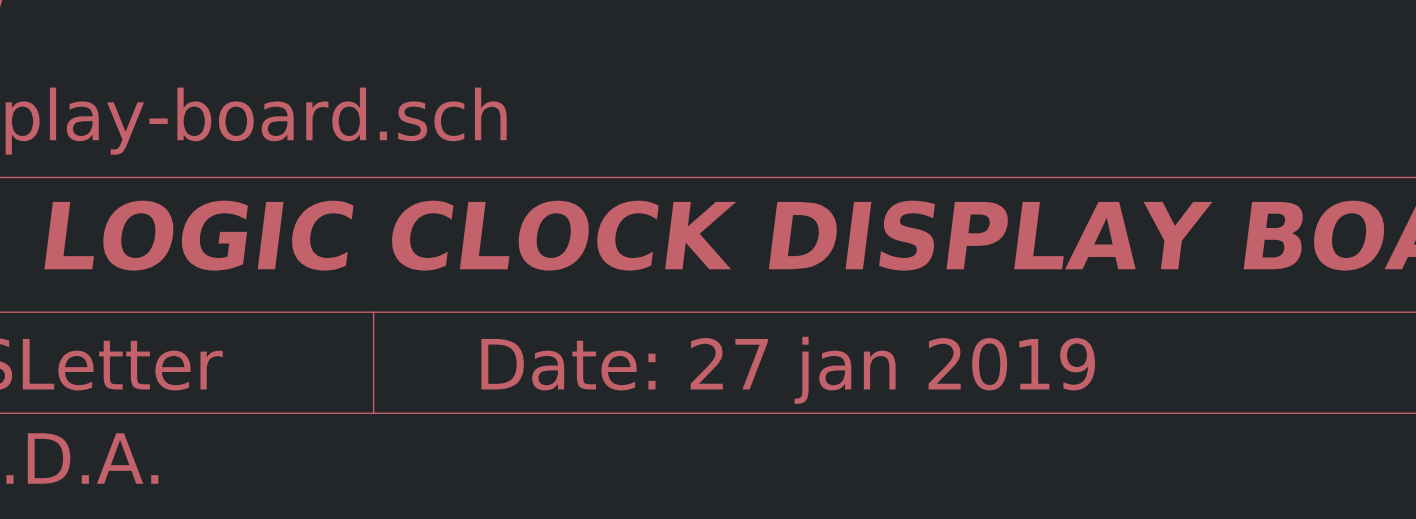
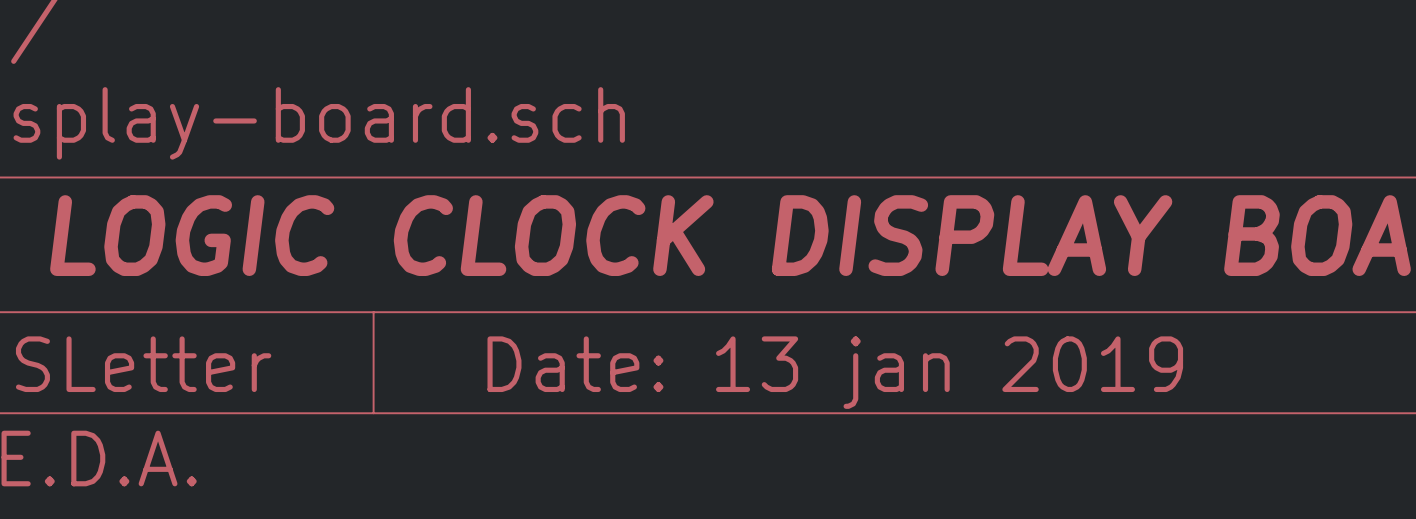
title block: Date: 27 jan 2019 (788, 370) -> Date: 13 jan 2019 (835, 372)

